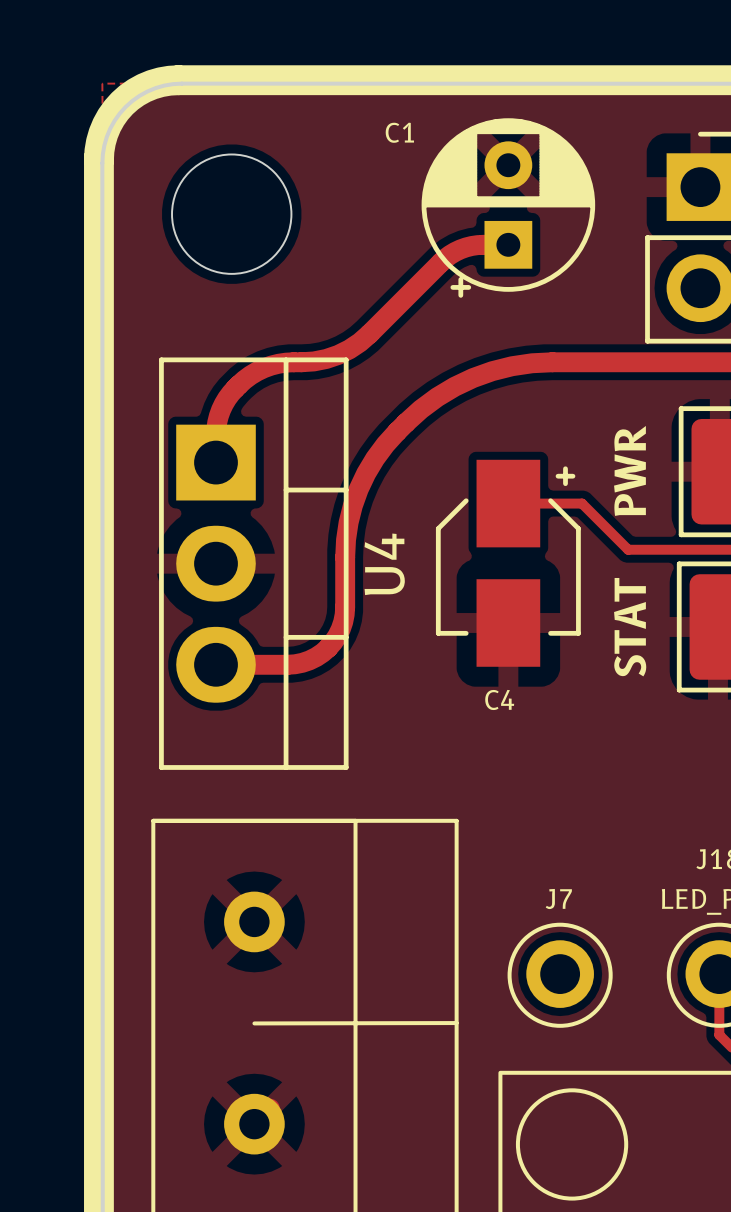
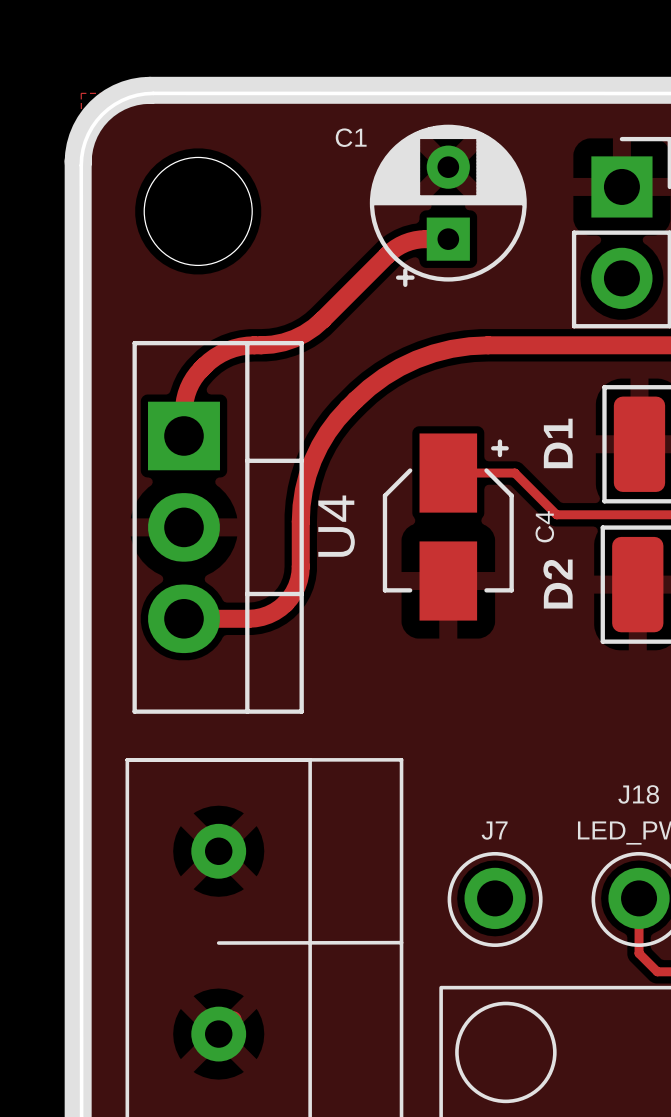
PWR name: PWR (629, 470) -> D1 (558, 443)
STAT name: STAT (630, 627) -> D2 (558, 584)
C4 name rotation: 0° (499, 699) -> 90° counterclockwise (544, 526)
C4 name position: C4 (499, 699) -> C4 (544, 526)

